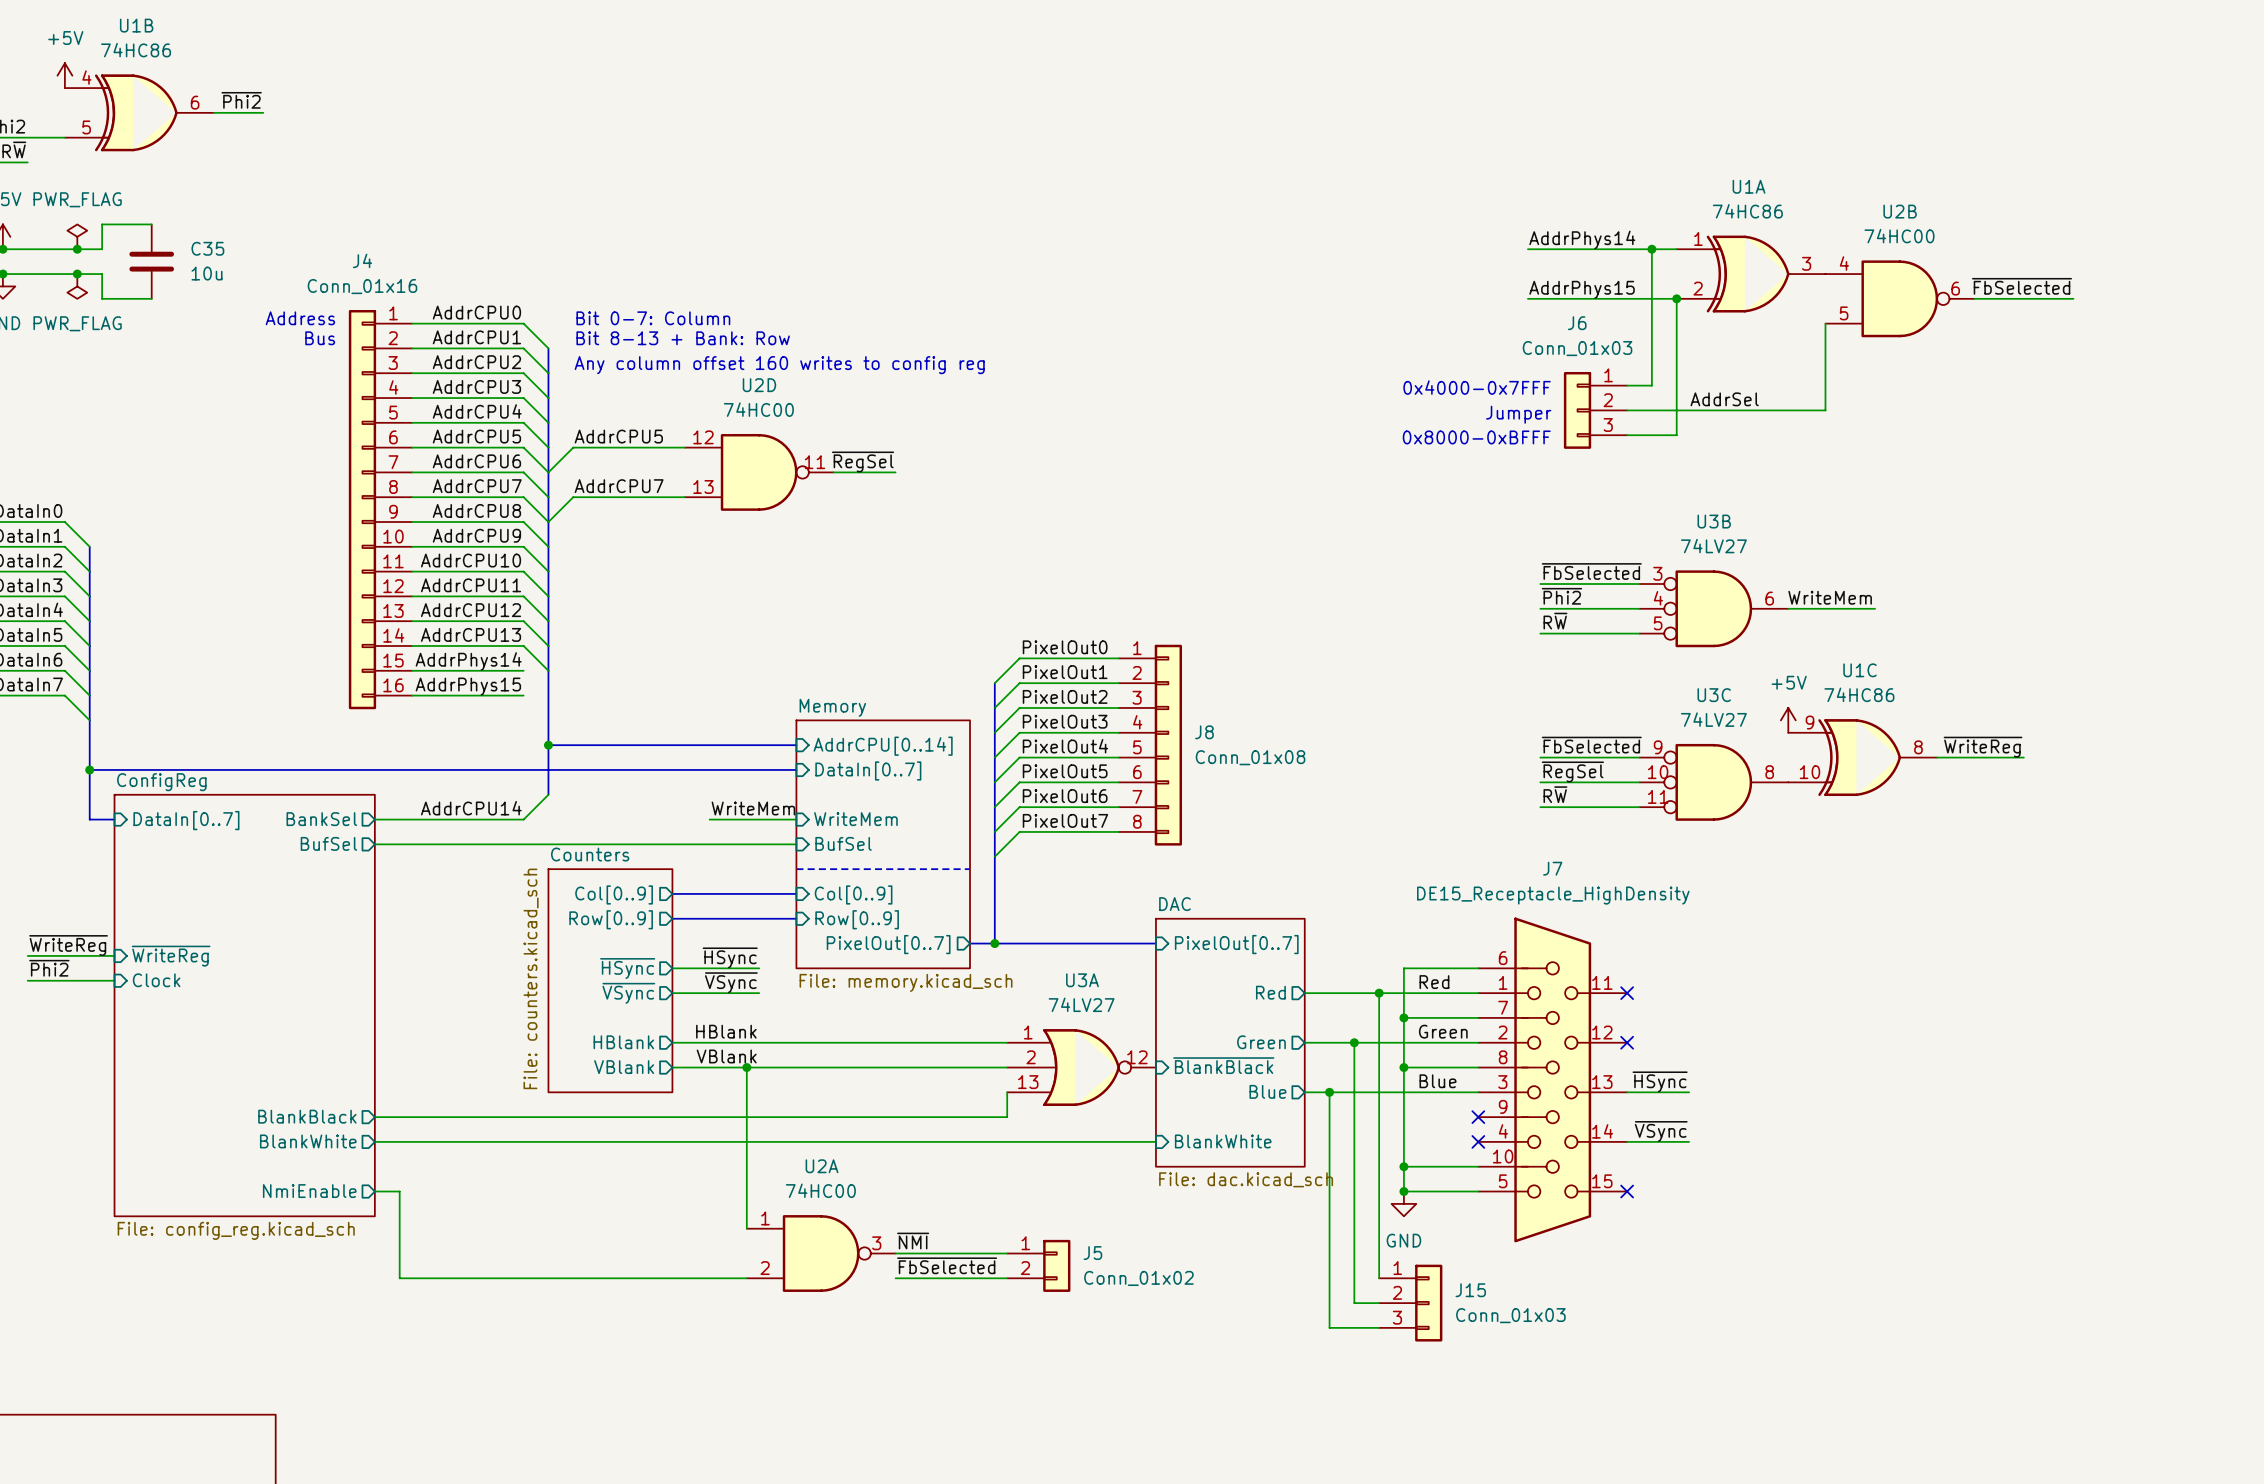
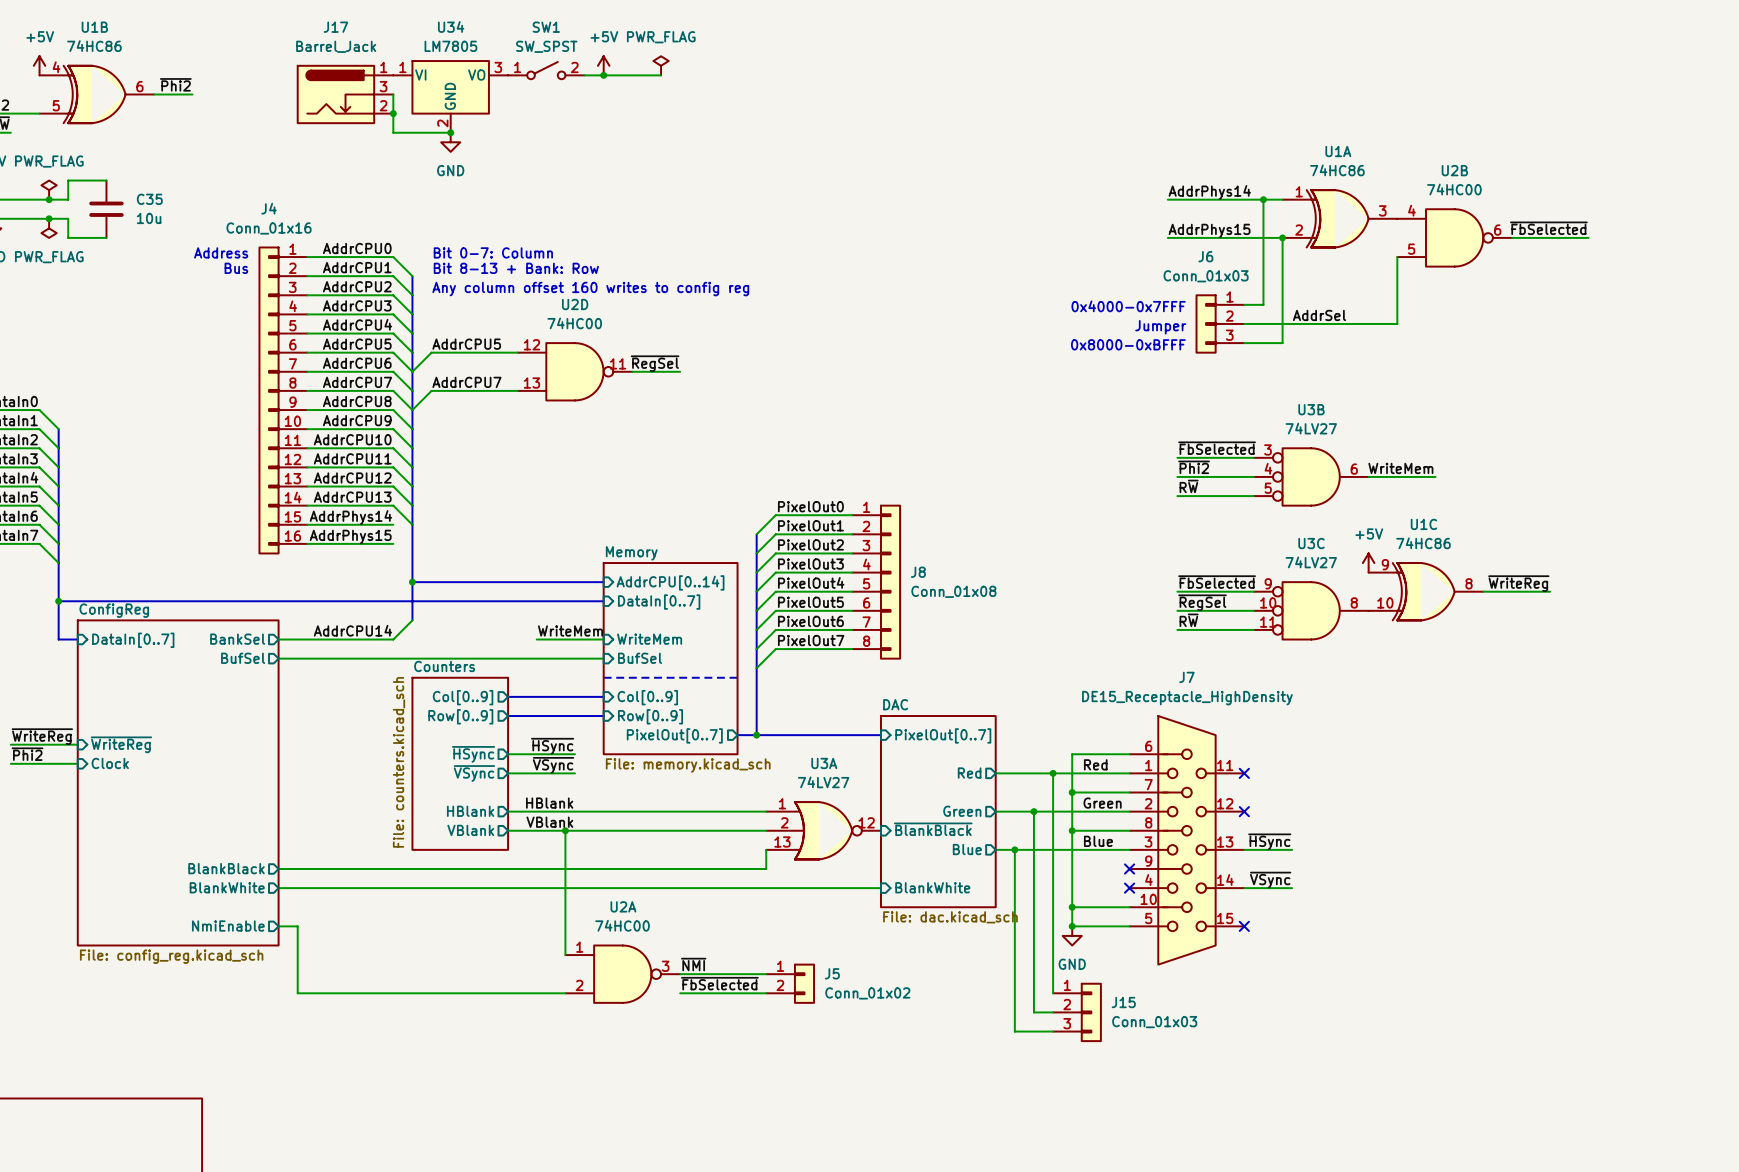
power symbol: none -> +5V (603, 65)
power symbol: none -> PWR_FLAG (661, 65)
SW1: none -> SW_SPST (546, 70)
wire: none -> (584, 75) (661, 75)
junction: none -> (603, 75)
J17: none -> Barrel_Jack (345, 94)
wire: none -> (393, 94) (393, 132) (450, 132)
U34: none -> LM7805 (450, 96)
junction: none -> (393, 113)
junction: none -> (450, 132)
power symbol: none -> GND (450, 142)

